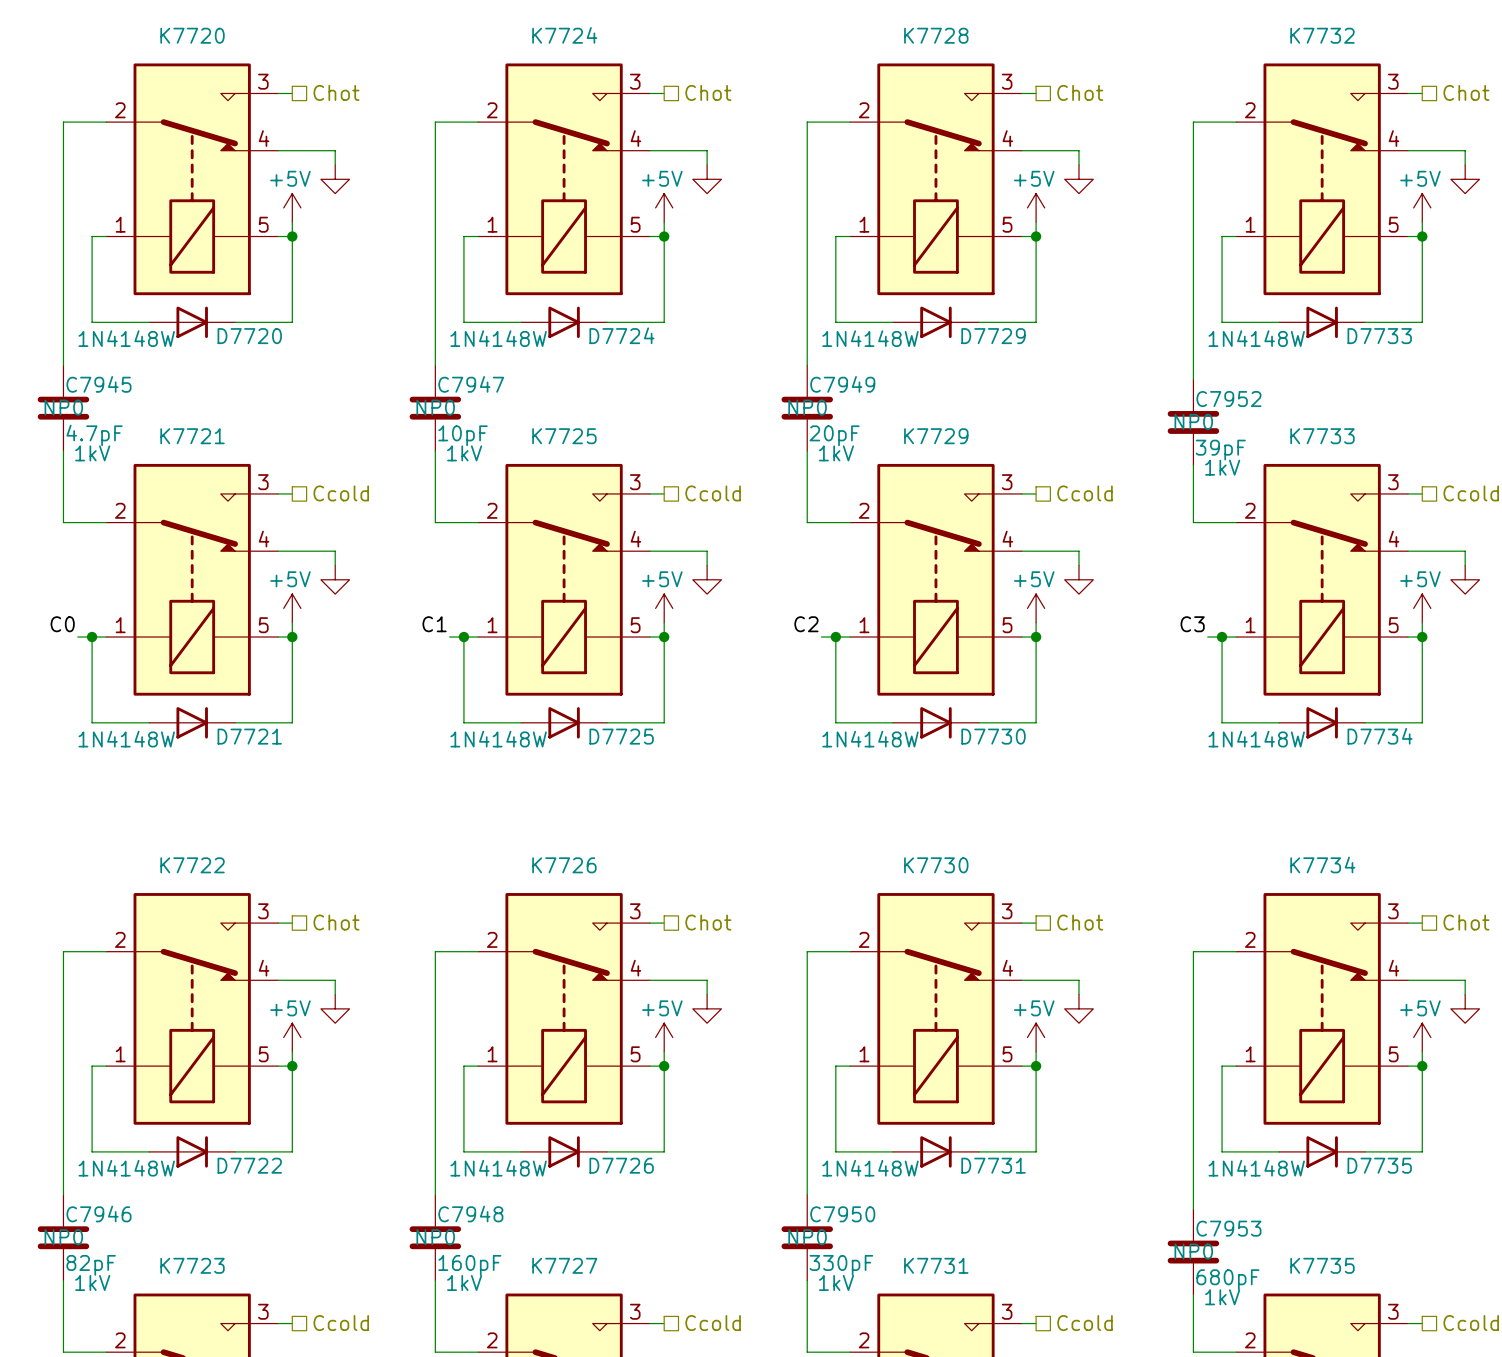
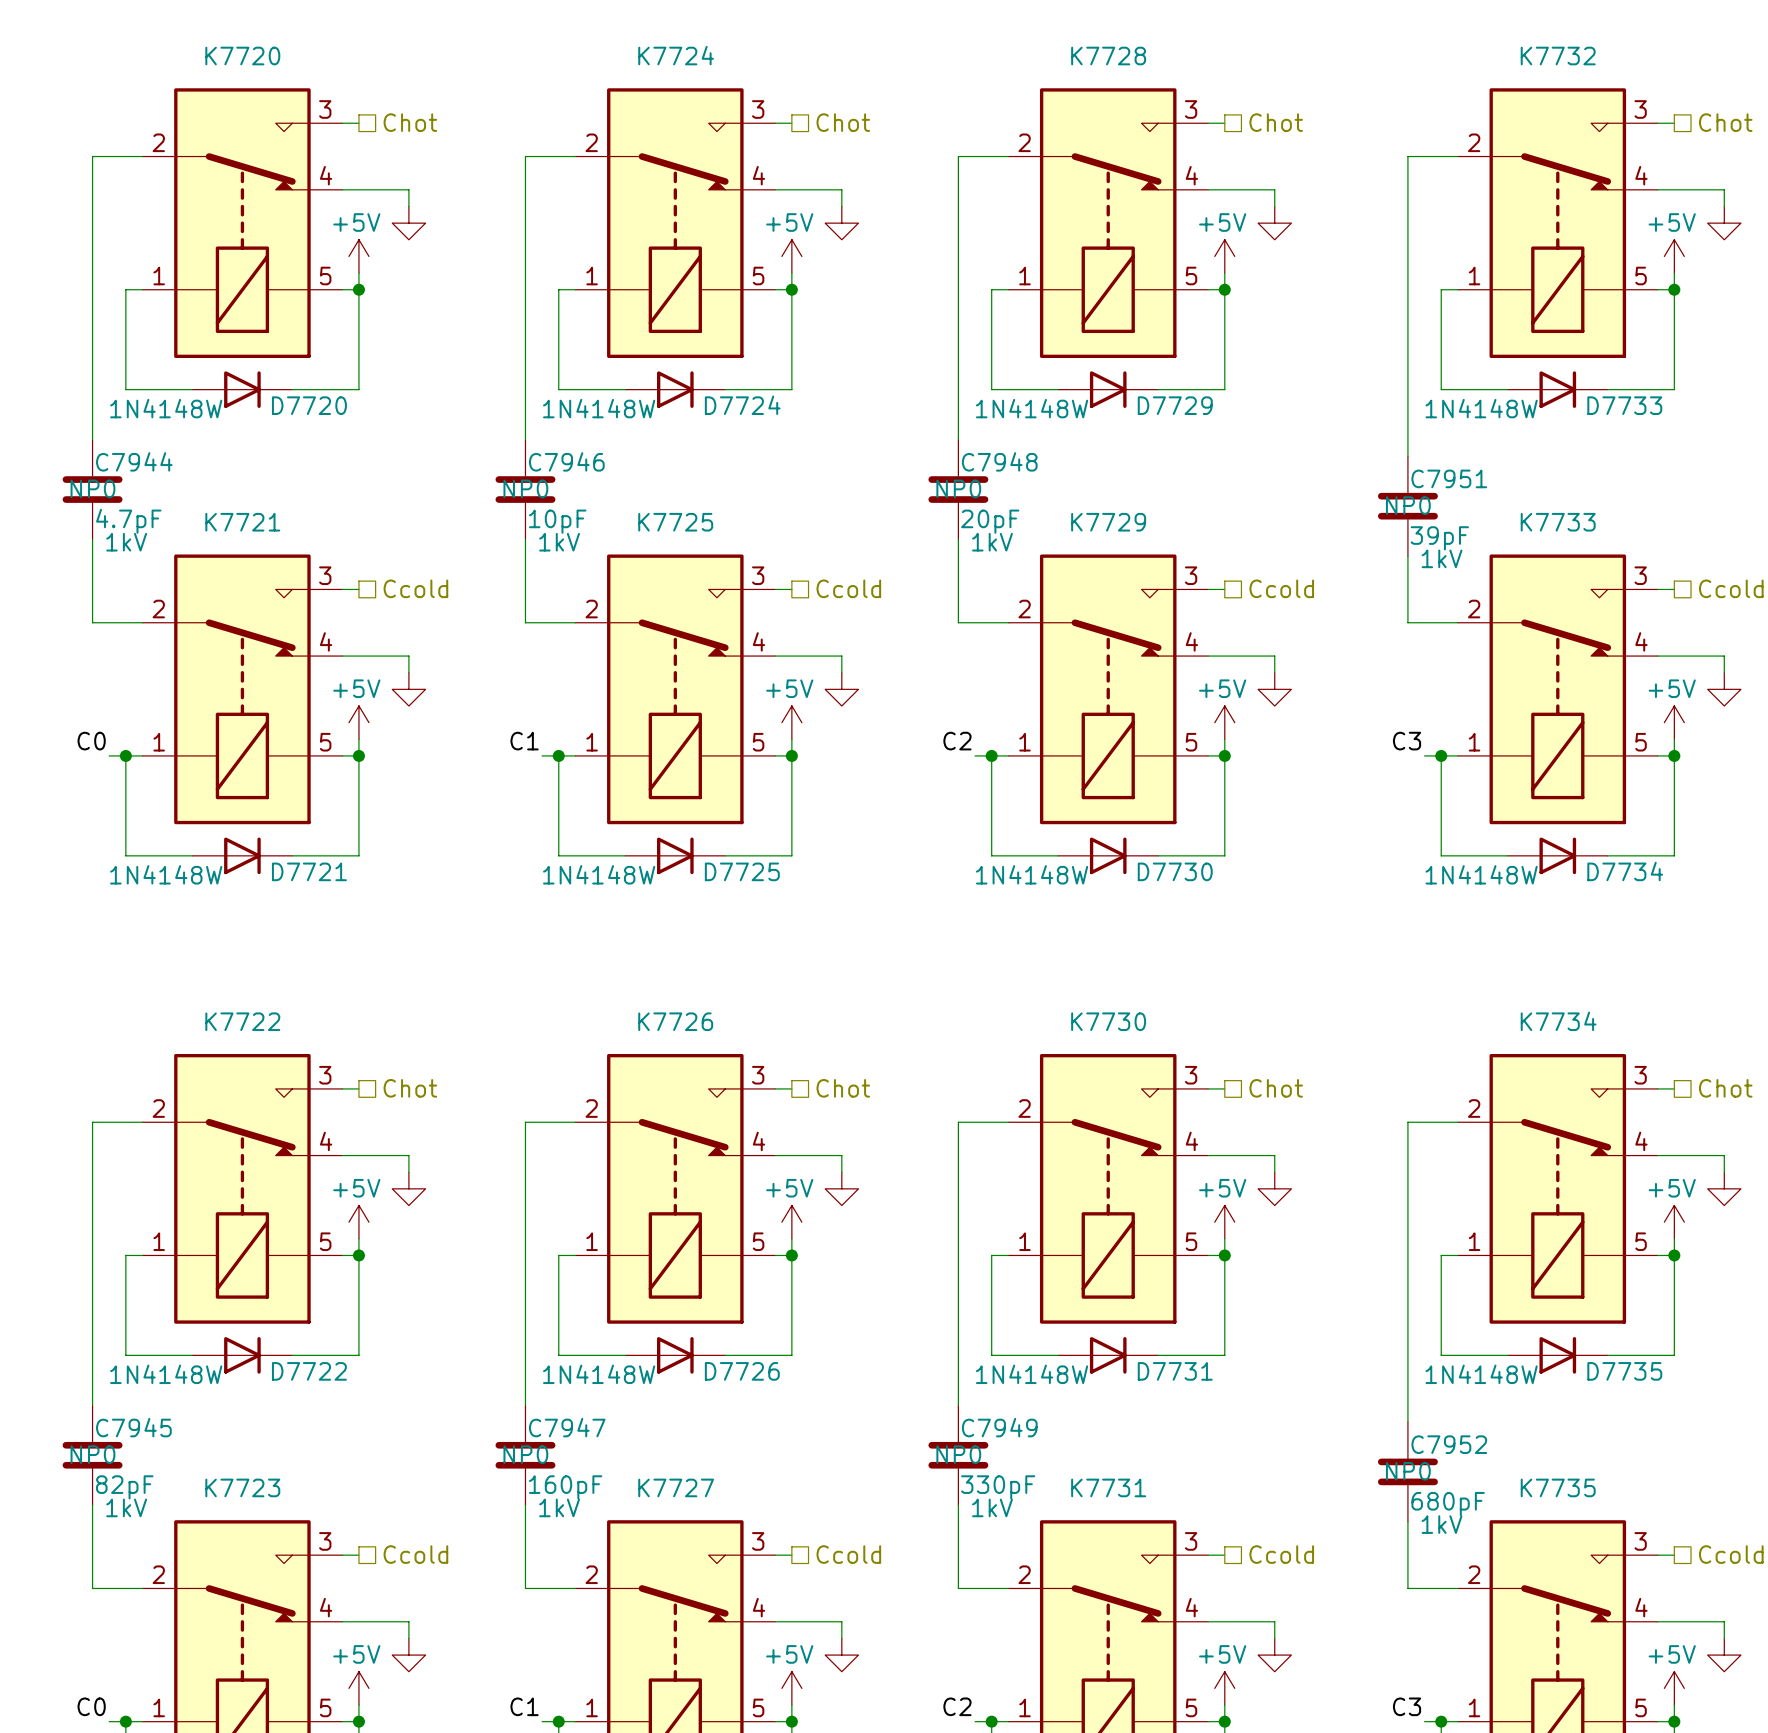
C7945 name: C7945 (98, 384) -> C7944 (134, 461)
C7947 name: C7947 (471, 384) -> C7946 (566, 461)
C7949 name: C7949 (842, 384) -> C7948 (999, 461)
C7952 name: C7952 (1228, 399) -> C7951 (1449, 478)
C7946 name: C7946 (98, 1213) -> C7945 (133, 1427)
C7948 name: C7948 (470, 1213) -> C7947 (567, 1427)
C7950 name: C7950 (842, 1214) -> C7949 (999, 1427)
C7953 name: C7953 (1228, 1228) -> C7952 (1449, 1444)

